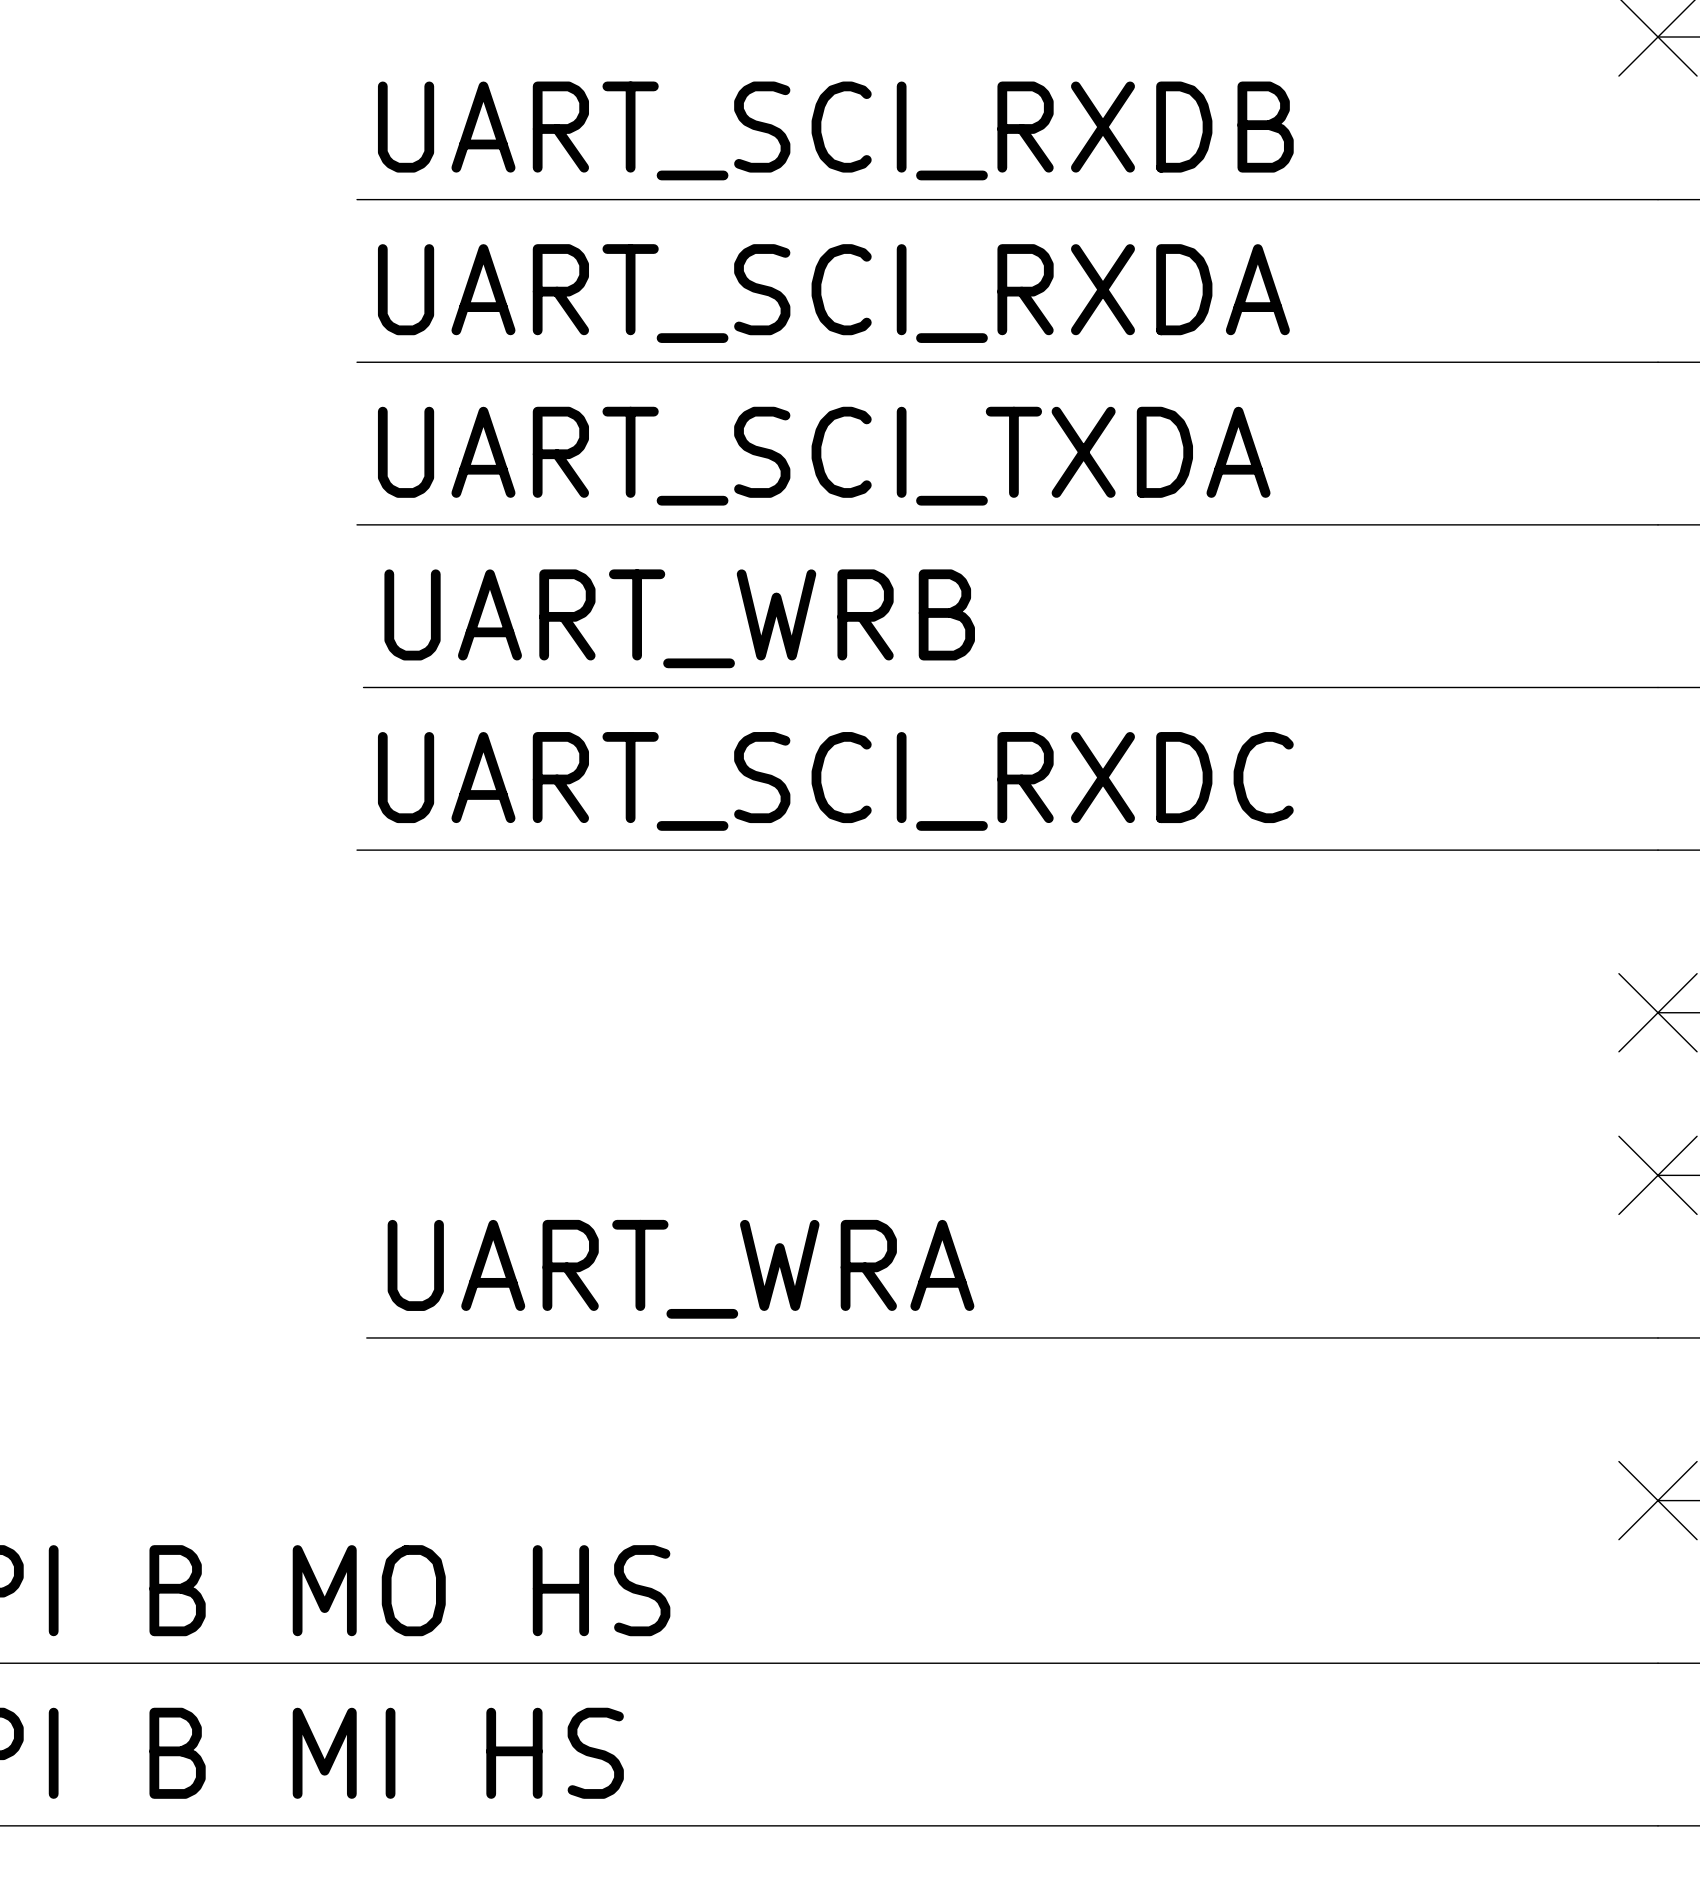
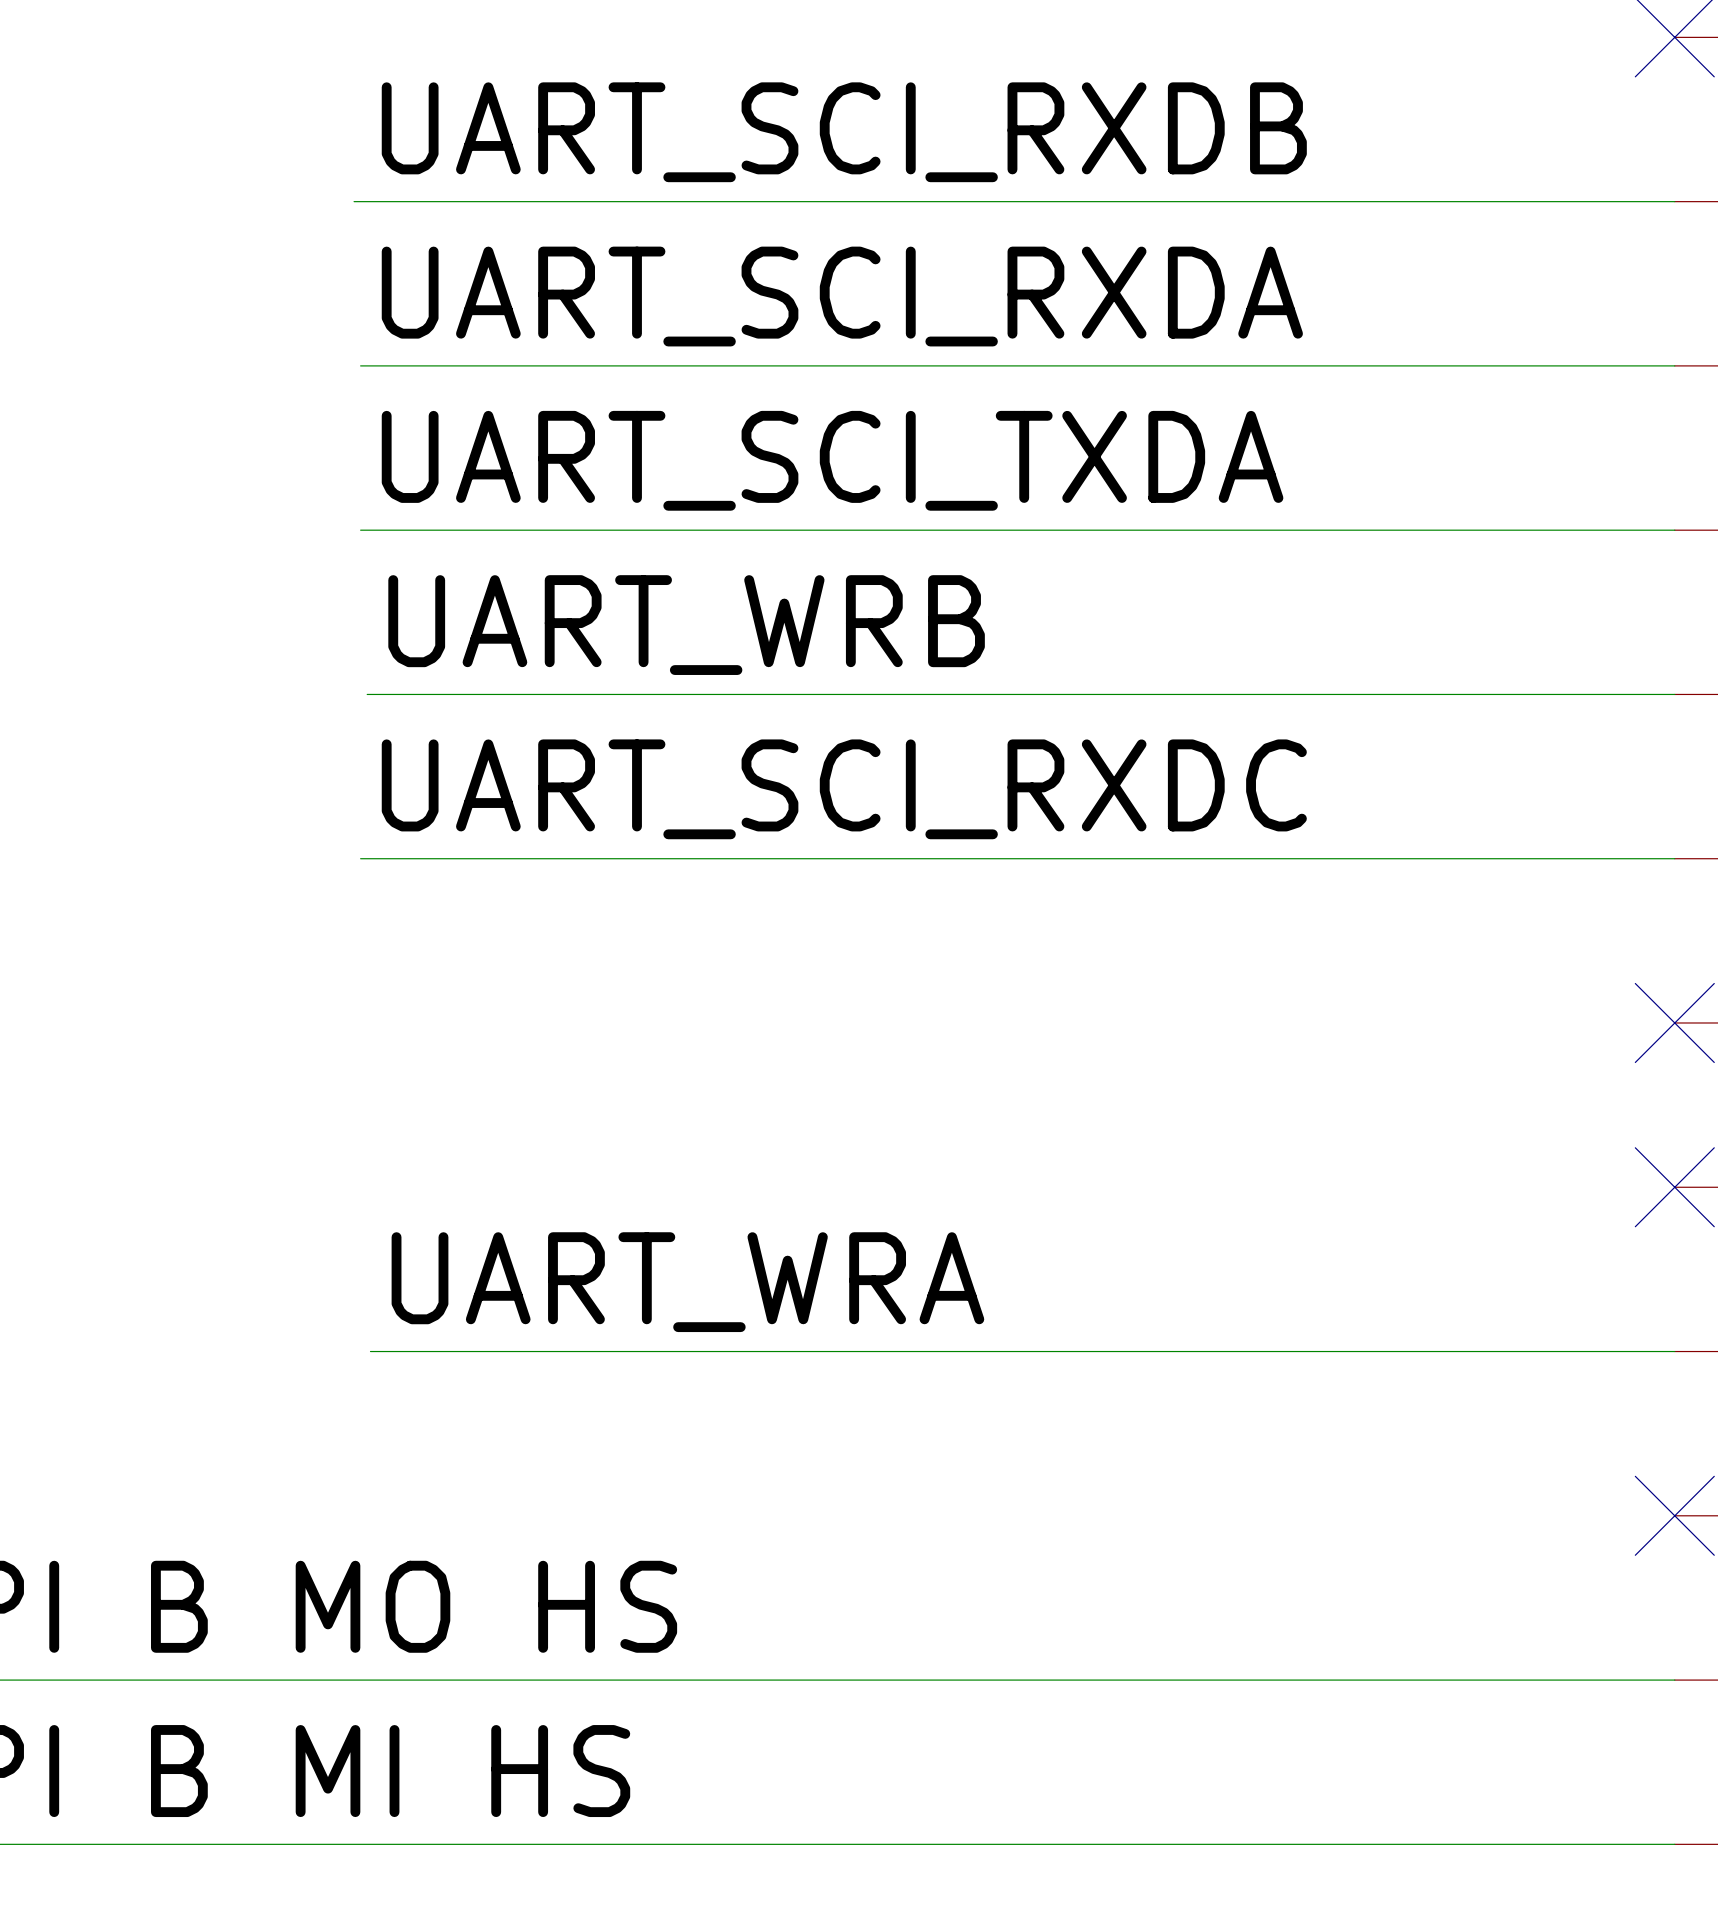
wire: none -> (354, 201) (360, 201)

